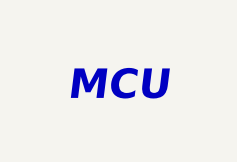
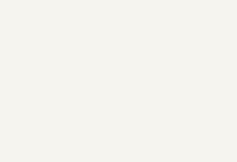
text: MCU (120, 83) -> none

